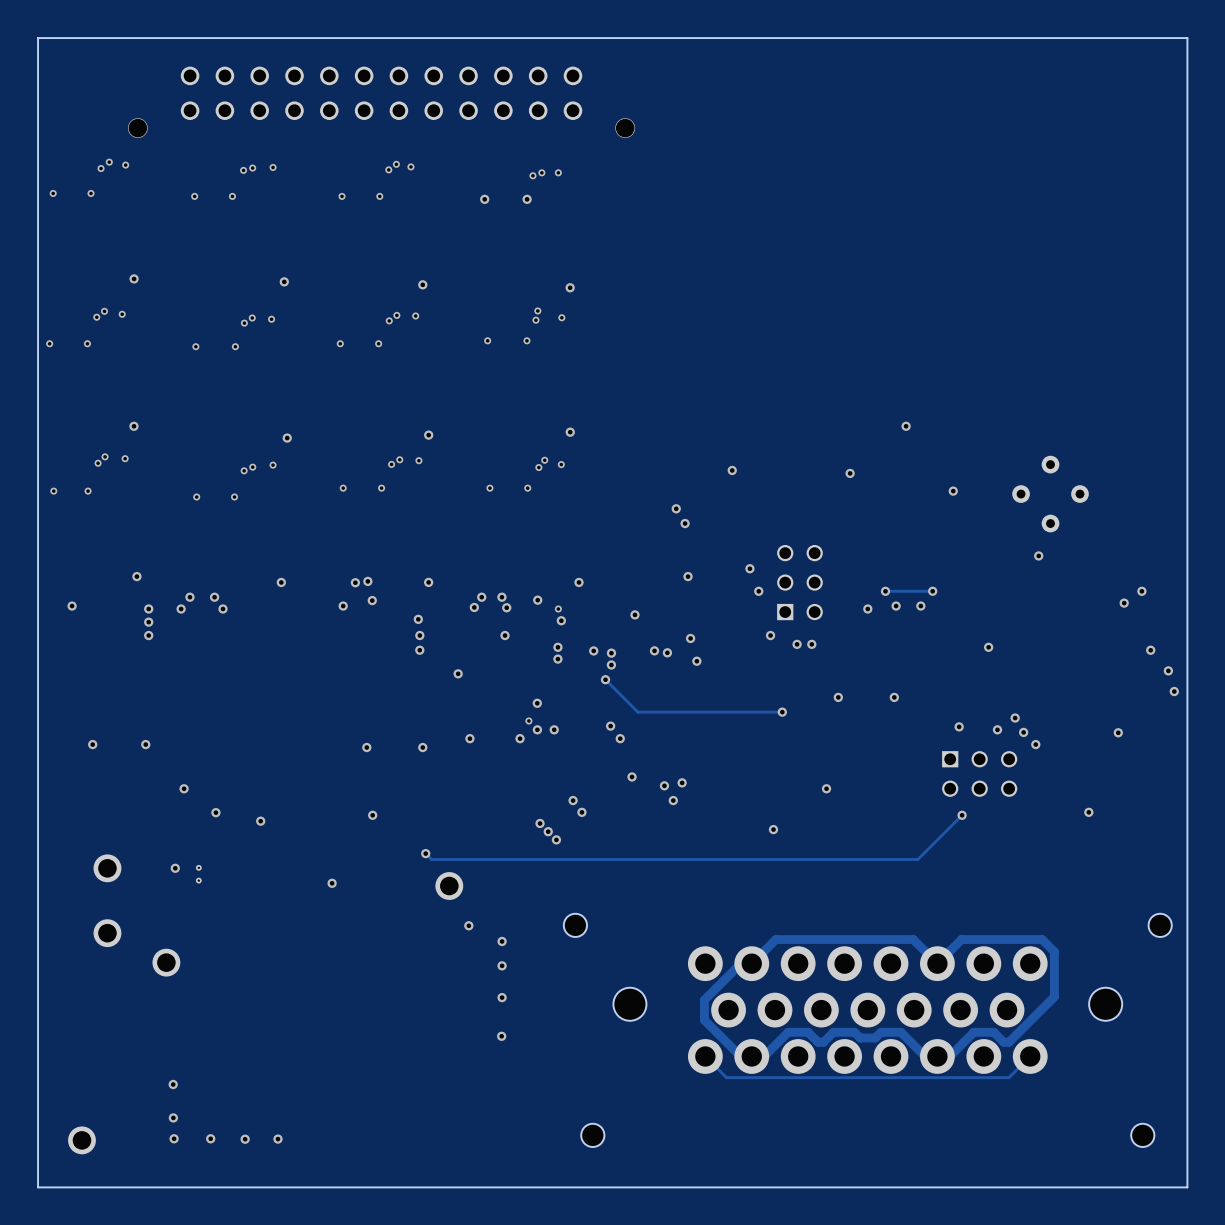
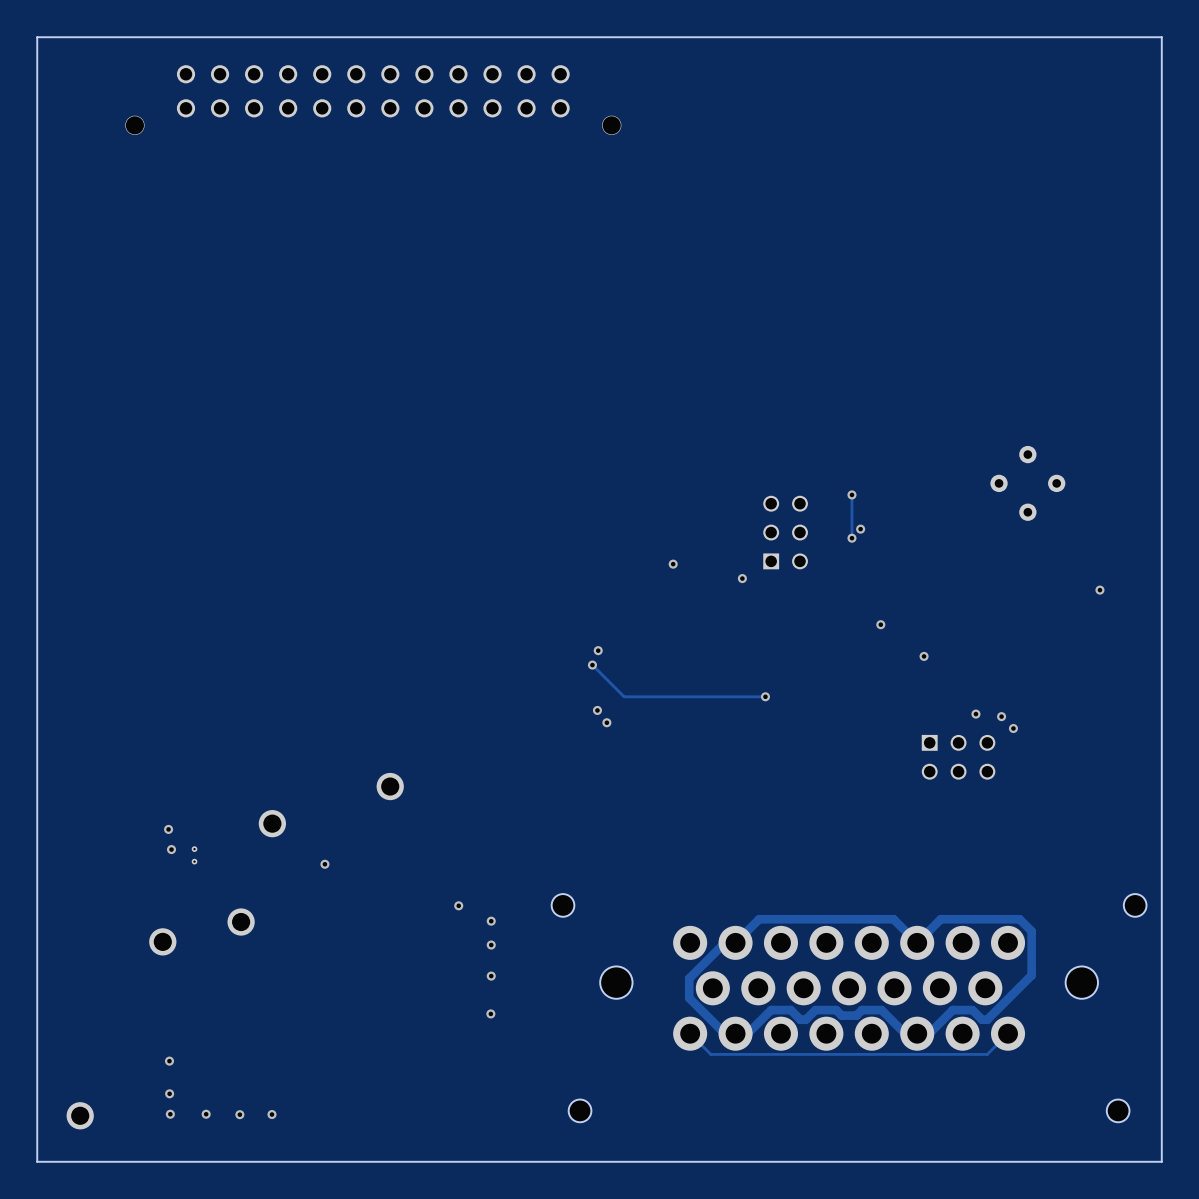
via: (109, 162) -> none
via: (396, 164) -> none
via: (125, 165) -> none
via: (410, 166) -> none
via: (273, 167) -> none
via: (101, 168) -> none
via: (252, 168) -> none
via: (388, 169) -> none
via: (243, 170) -> none
via: (541, 172) -> none
via: (558, 172) -> none
via: (532, 175) -> none
via: (53, 193) -> none
via: (90, 193) -> none
via: (194, 196) -> none
via: (232, 196) -> none
via: (342, 196) -> none
via: (379, 196) -> none
via: (484, 199) -> none
via: (527, 199) -> none
via: (134, 278) -> none
via: (284, 281) -> none
via: (422, 284) -> none
via: (570, 287) -> none
via: (537, 310) -> none
via: (104, 311) -> none
via: (122, 314) -> none
via: (396, 315) -> none
via: (415, 316) -> none
via: (96, 317) -> none
via: (561, 317) -> none
via: (252, 318) -> none
via: (271, 319) -> none
via: (389, 320) -> none
via: (535, 320) -> none
via: (244, 323) -> none
via: (487, 340) -> none
via: (526, 340) -> none
via: (49, 343) -> none
via: (87, 343) -> none
via: (340, 343) -> none
via: (378, 343) -> none
via: (195, 346) -> none
via: (235, 346) -> none
via: (133, 426) -> none
via: (906, 426) -> none
via: (570, 432) -> none
via: (428, 435) -> none
via: (287, 438) -> none
via: (105, 456) -> none
via: (125, 458) -> none
via: (399, 459) -> none
via: (418, 460) -> none
via: (544, 460) -> none
via: (98, 463) -> none
via: (391, 464) -> none
via: (561, 464) -> none
via: (273, 465) -> none
via: (252, 467) -> none
via: (538, 467) -> none
via: (244, 470) -> none
via: (732, 470) -> none
via: (850, 473) -> none
via: (343, 488) -> none
via: (381, 488) -> none
via: (489, 488) -> none
via: (527, 488) -> none
via: (53, 491) -> none
via: (88, 491) -> none
via: (953, 491) -> none
via: (196, 497) -> none
via: (234, 497) -> none
track: none -> (851, 494) (851, 538)
via: none -> (851, 494)
via: (676, 508) -> none
via: (685, 523) -> none
via: none -> (860, 529)
via: none -> (851, 538)
via: (1038, 555) -> none
via: (749, 568) -> none
via: (136, 576) -> none
via: (367, 581) -> none
via: (281, 582) -> none
via: (355, 582) -> none
via: (428, 582) -> none
via: (578, 582) -> none
part position: (799, 582) -> (785, 532)
via: (885, 591) -> none
track: (932, 591) (885, 591) -> none
via: (932, 591) -> none
via: (1141, 591) -> none
via: (189, 597) -> none
via: (214, 597) -> none
via: (481, 597) -> none
via: (501, 597) -> none
via: (372, 600) -> none
via: (537, 600) -> none
via: (72, 606) -> none
via: (343, 606) -> none
via: (896, 606) -> none
via: (920, 606) -> none
via: (474, 607) -> none
via: (506, 607) -> none
via: (148, 608) -> none
via: (181, 608) -> none
via: (222, 608) -> none
via: (558, 608) -> none
via: (867, 608) -> none
via: (634, 614) -> none
via: (418, 619) -> none
via: (561, 620) -> none
via: (148, 622) -> none
via: (148, 635) -> none
via: (419, 635) -> none
via: (505, 635) -> none
via: (770, 635) -> none
via: (690, 638) -> none
via: none -> (880, 624)
via: (797, 644) -> none
via: (811, 644) -> none
via: (557, 647) -> none
via: (988, 647) -> none
via: (419, 650) -> none
via: (593, 650) -> none
via: (654, 650) -> none
via: (1150, 650) -> none
via: (667, 652) -> none
via: (611, 653) -> none
via: (557, 659) -> none
via: (696, 661) -> none
via: none -> (924, 656)
via: (1168, 670) -> none
via: (458, 673) -> none
via: (1174, 691) -> none
via: (838, 697) -> none
via: (894, 697) -> none
via: (537, 703) -> none
via: (1015, 718) -> none
via: (528, 720) -> none
via: (959, 726) -> none
via: (537, 729) -> none
via: (554, 729) -> none
via: (1118, 732) -> none
via: (469, 738) -> none
via: (520, 738) -> none
via: (92, 744) -> none
via: (145, 744) -> none
via: (366, 747) -> none
via: (422, 747) -> none
via: (632, 776) -> none
via: (682, 782) -> none
via: (664, 785) -> none
via: (184, 788) -> none
via: (826, 788) -> none
via: (573, 800) -> none
via: (673, 800) -> none
part: none -> (390, 786)
via: (215, 812) -> none
via: (581, 812) -> none
via: (1088, 812) -> none
via: (372, 815) -> none
track: (962, 815) (917, 859) (431, 859) (425, 853) -> none
via: (962, 815) -> none
via: (260, 821) -> none
via: (540, 823) -> none
via: (773, 829) -> none
via: (548, 831) -> none
via: (556, 839) -> none
part: none -> (272, 823)
via: none -> (168, 829)
via: (425, 853) -> none
part: (107, 868) -> none
part: (449, 886) -> none
part: (107, 933) -> none
part: none -> (241, 922)

